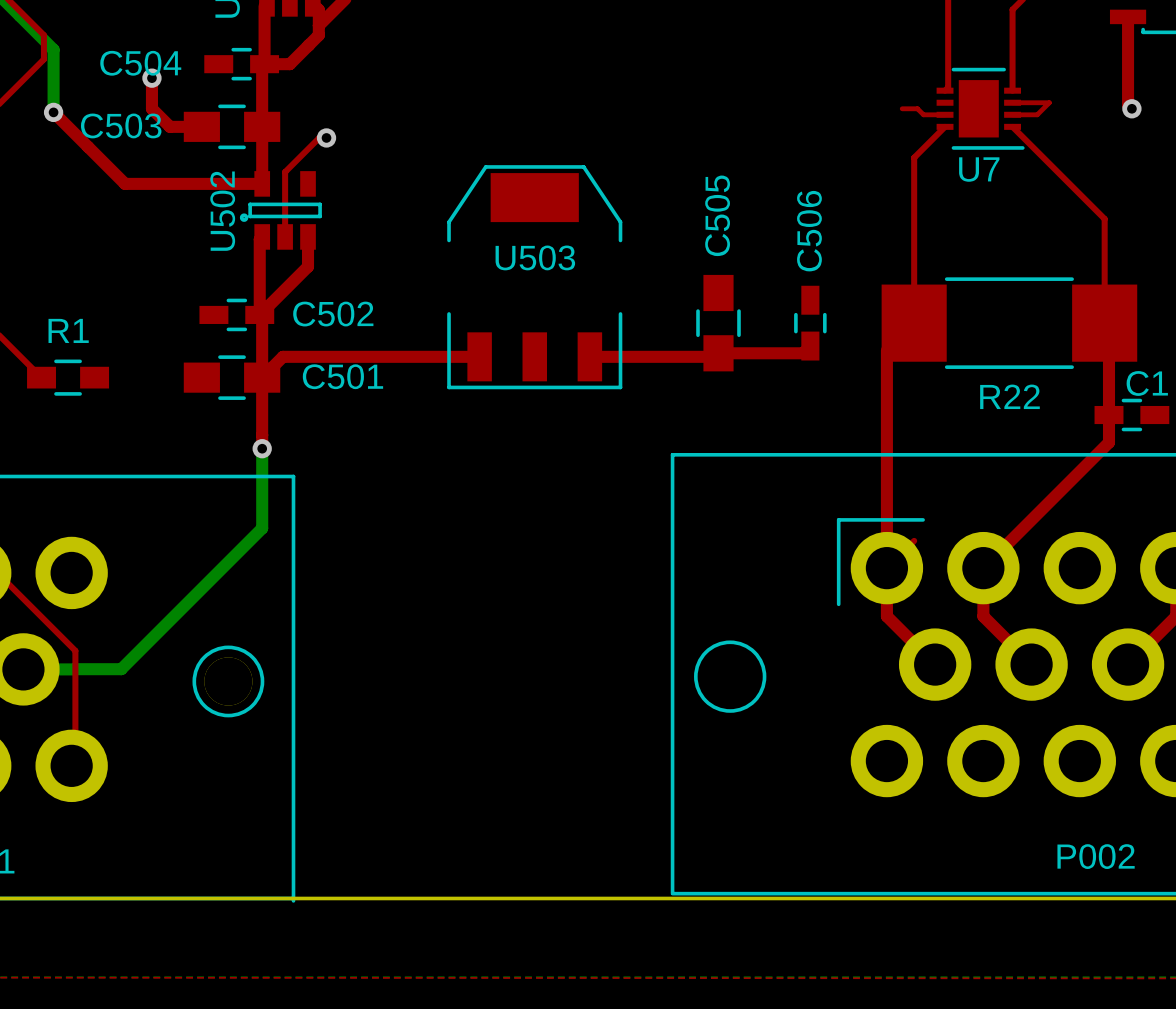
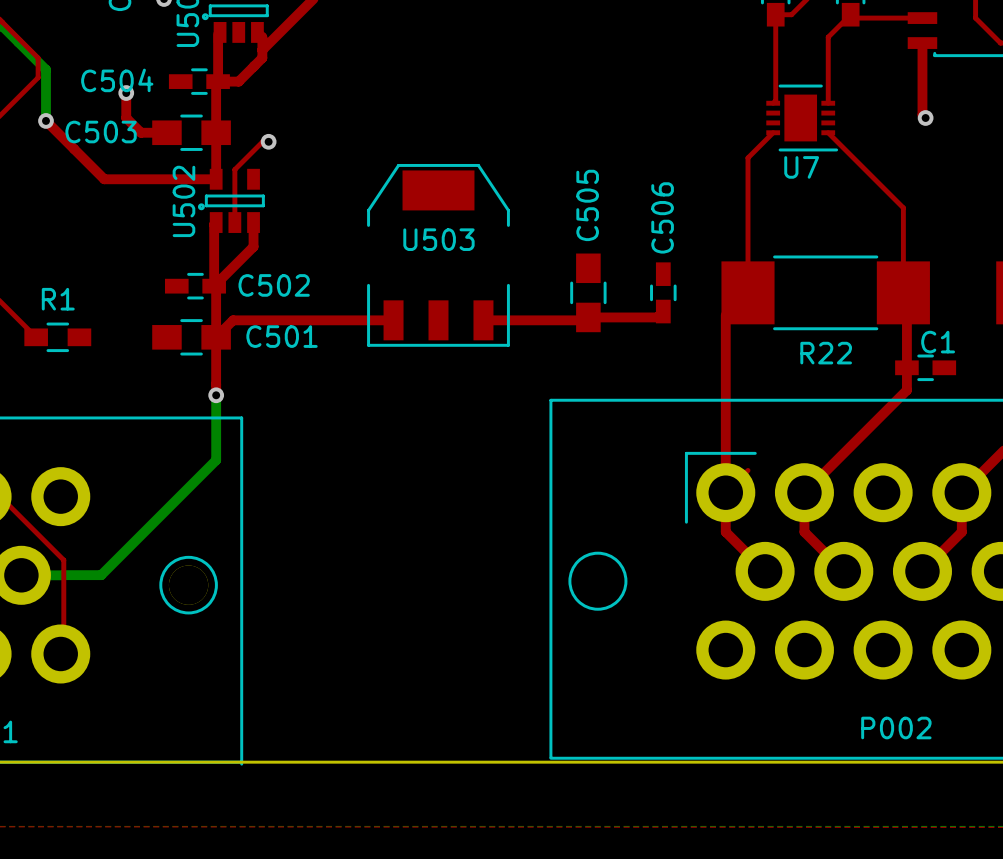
top track: (1012, 102) (1049, 102) (1037, 114) (1012, 114) -> none
top track: (902, 108) (917, 108) (923, 114) (945, 114) -> none

